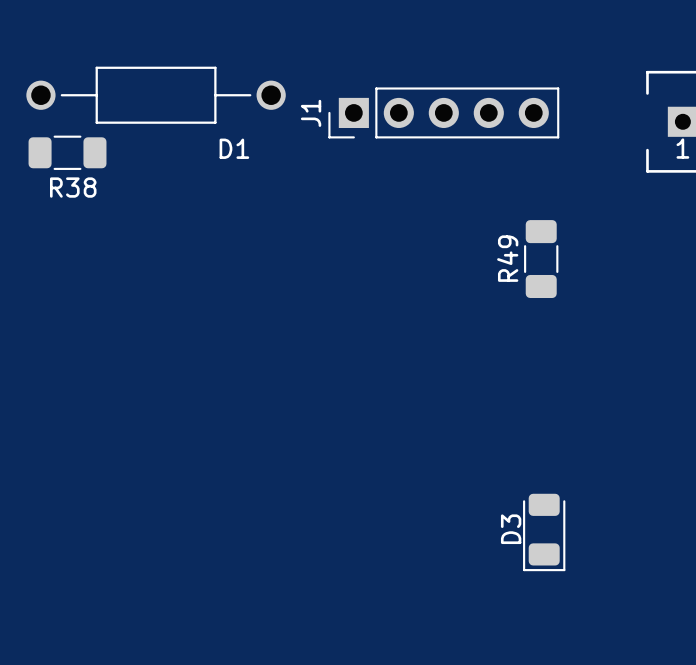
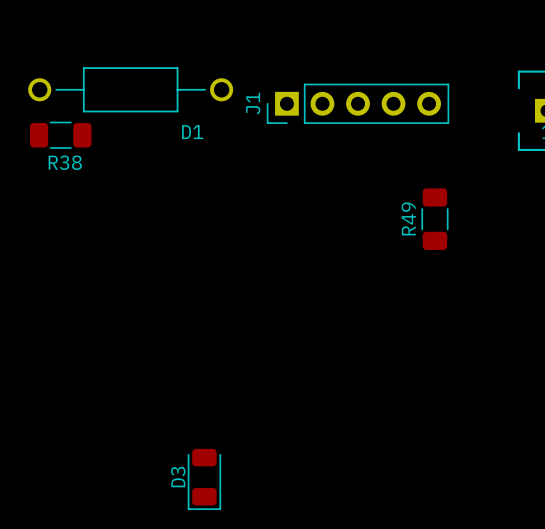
D3 position: (544, 532) -> (204, 479)

